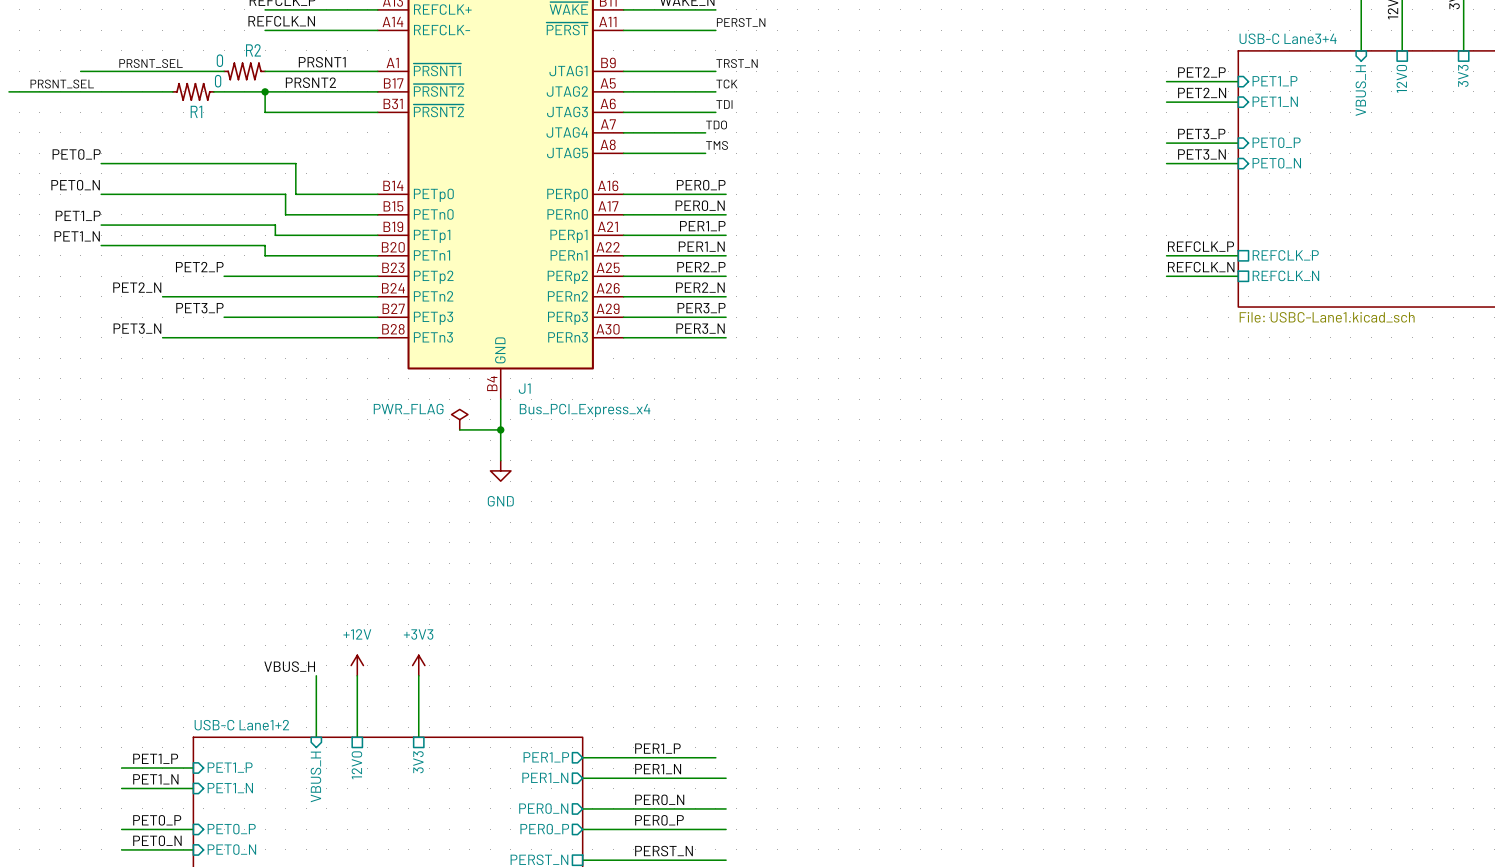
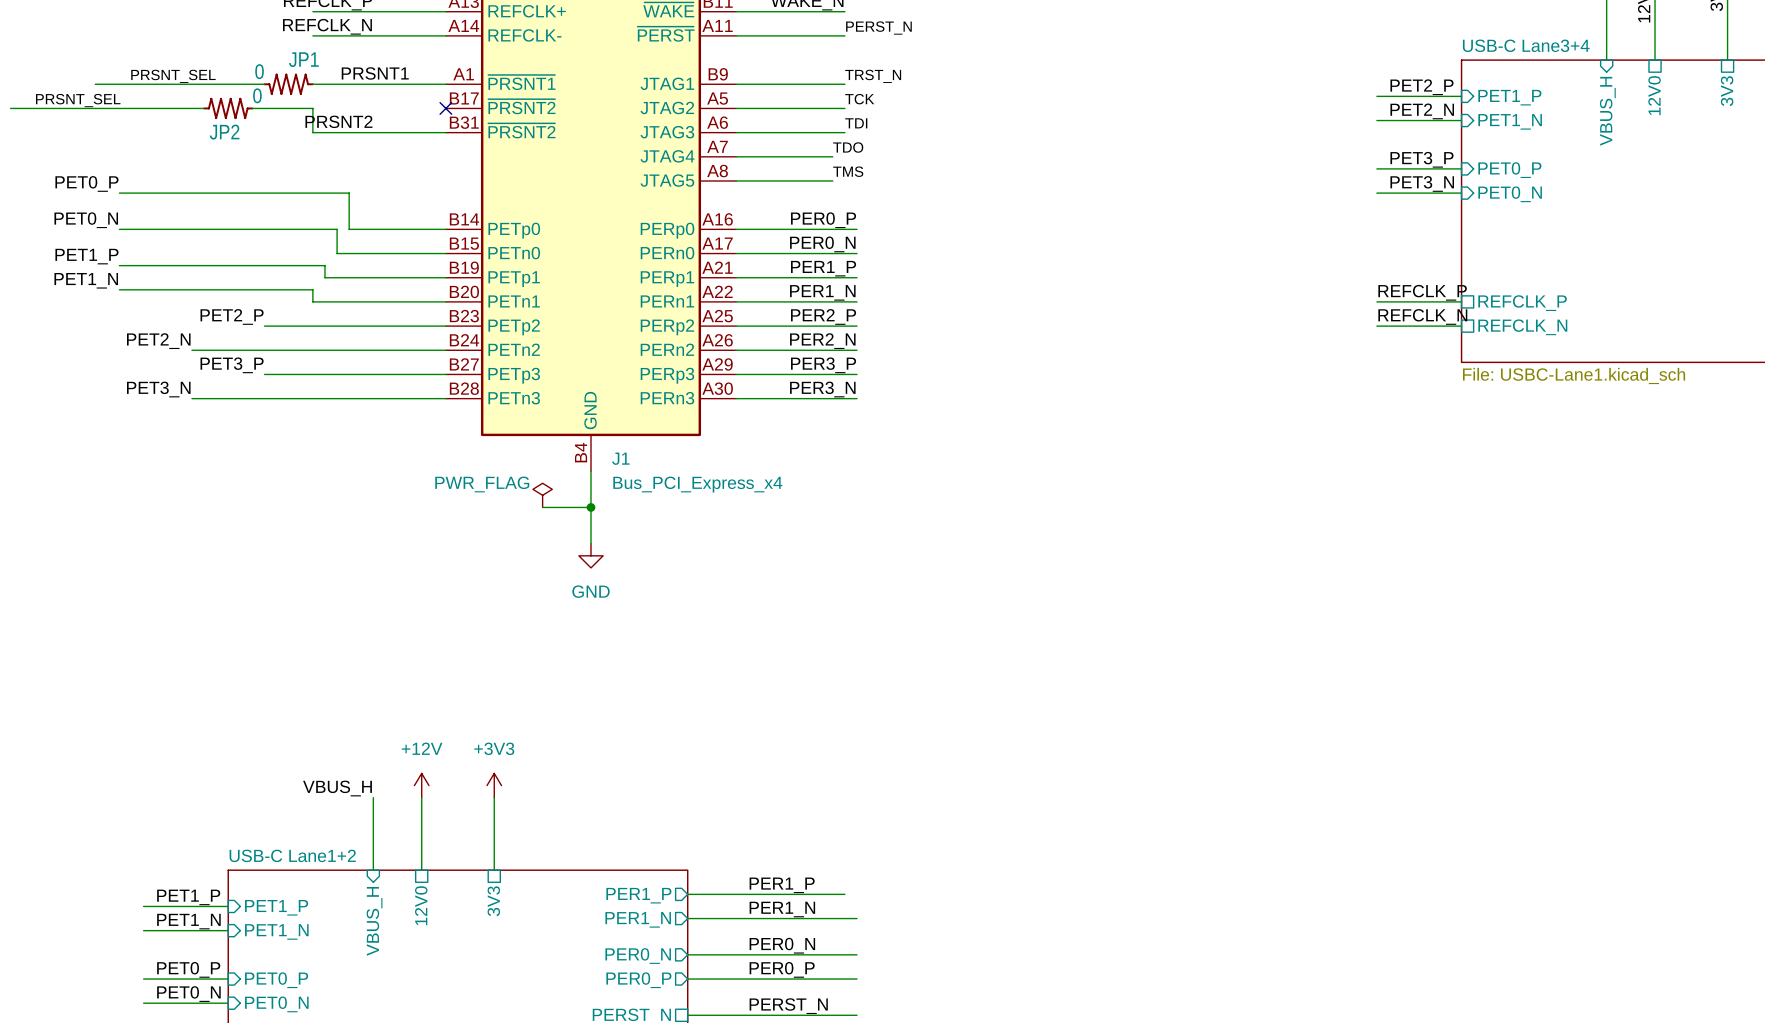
R2 name: R2 (253, 50) -> JP1 (303, 59)
label position: PRSNT2 (310, 82) -> PRSNT2 (338, 121)
wire: (265, 91) (377, 91) -> none
junction: (265, 91) -> none
no-connect mark: none -> (445, 108)
R1 name: R1 (196, 111) -> JP2 (224, 132)

